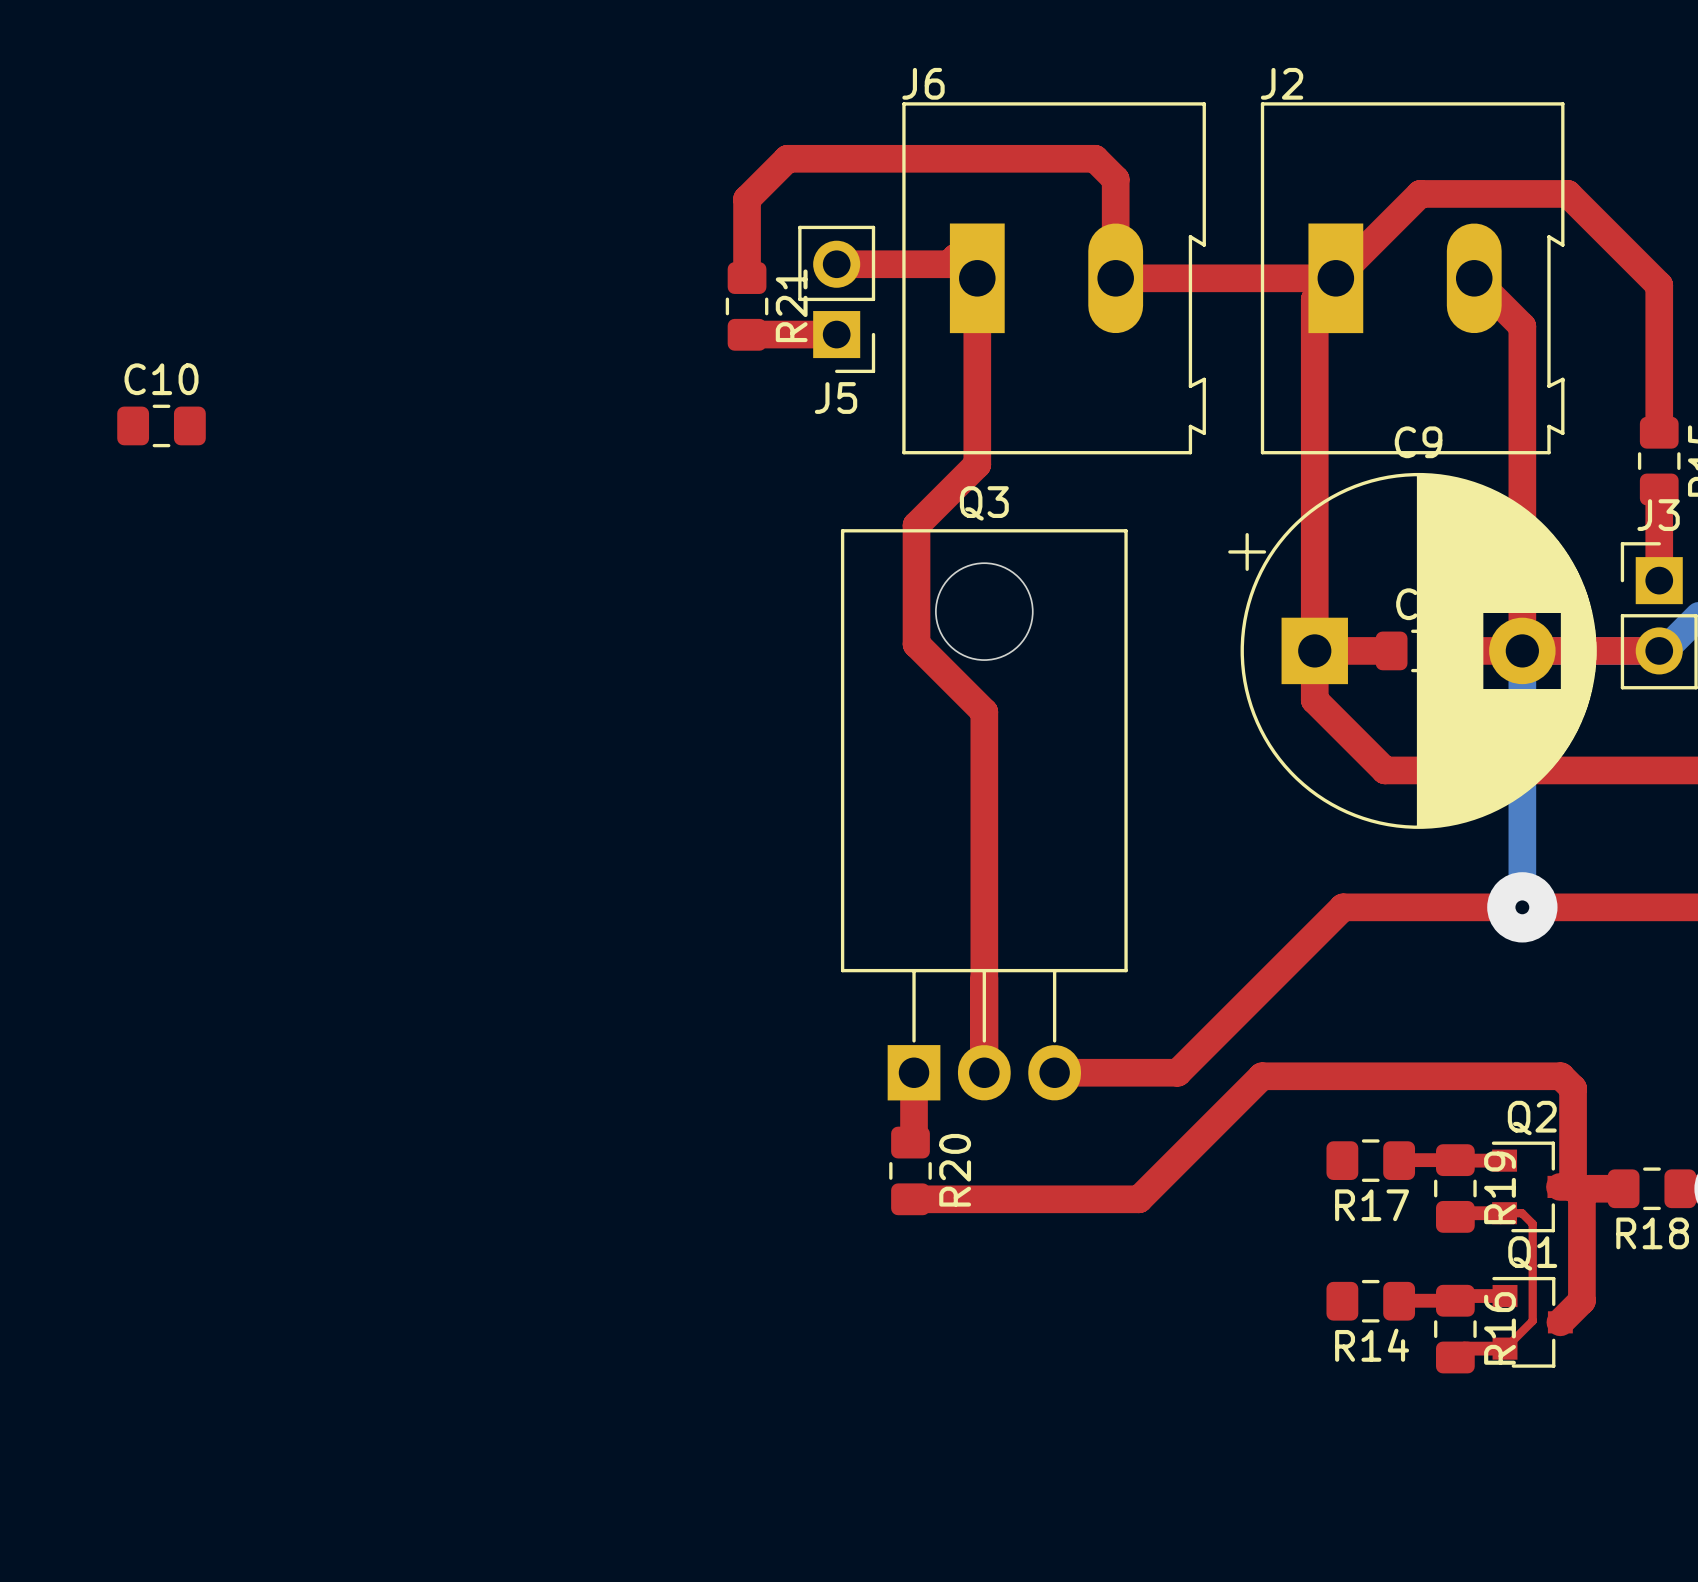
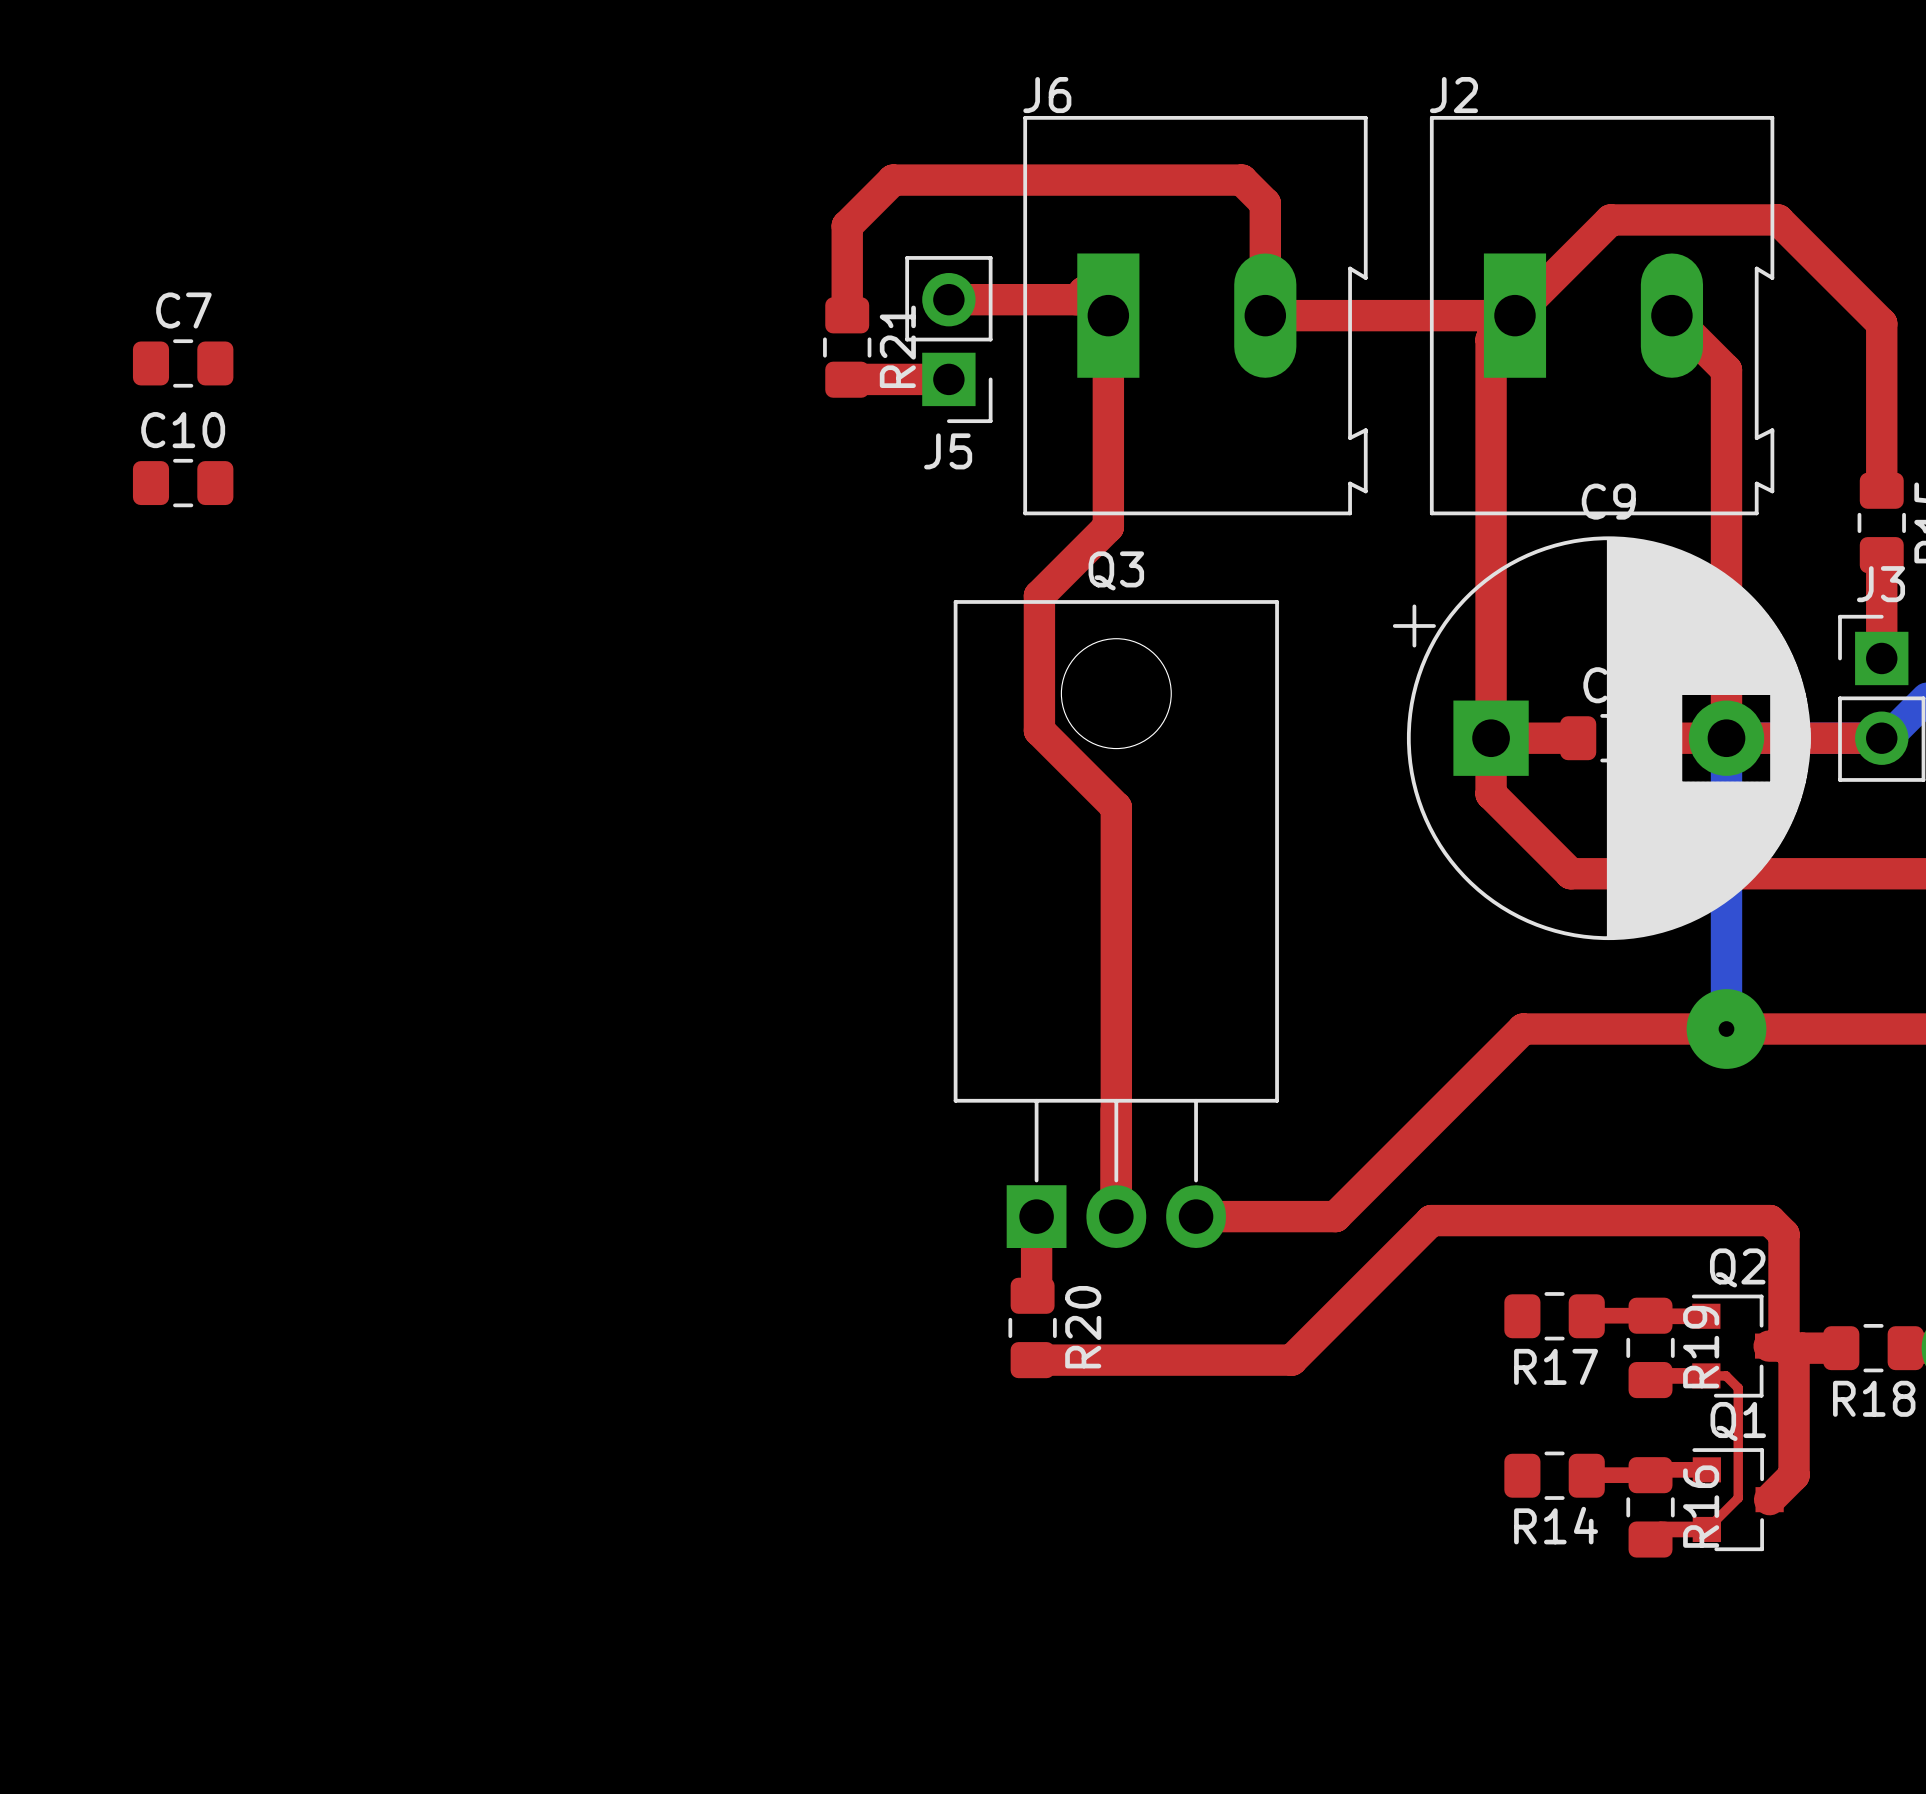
C7: none -> (183, 363)

